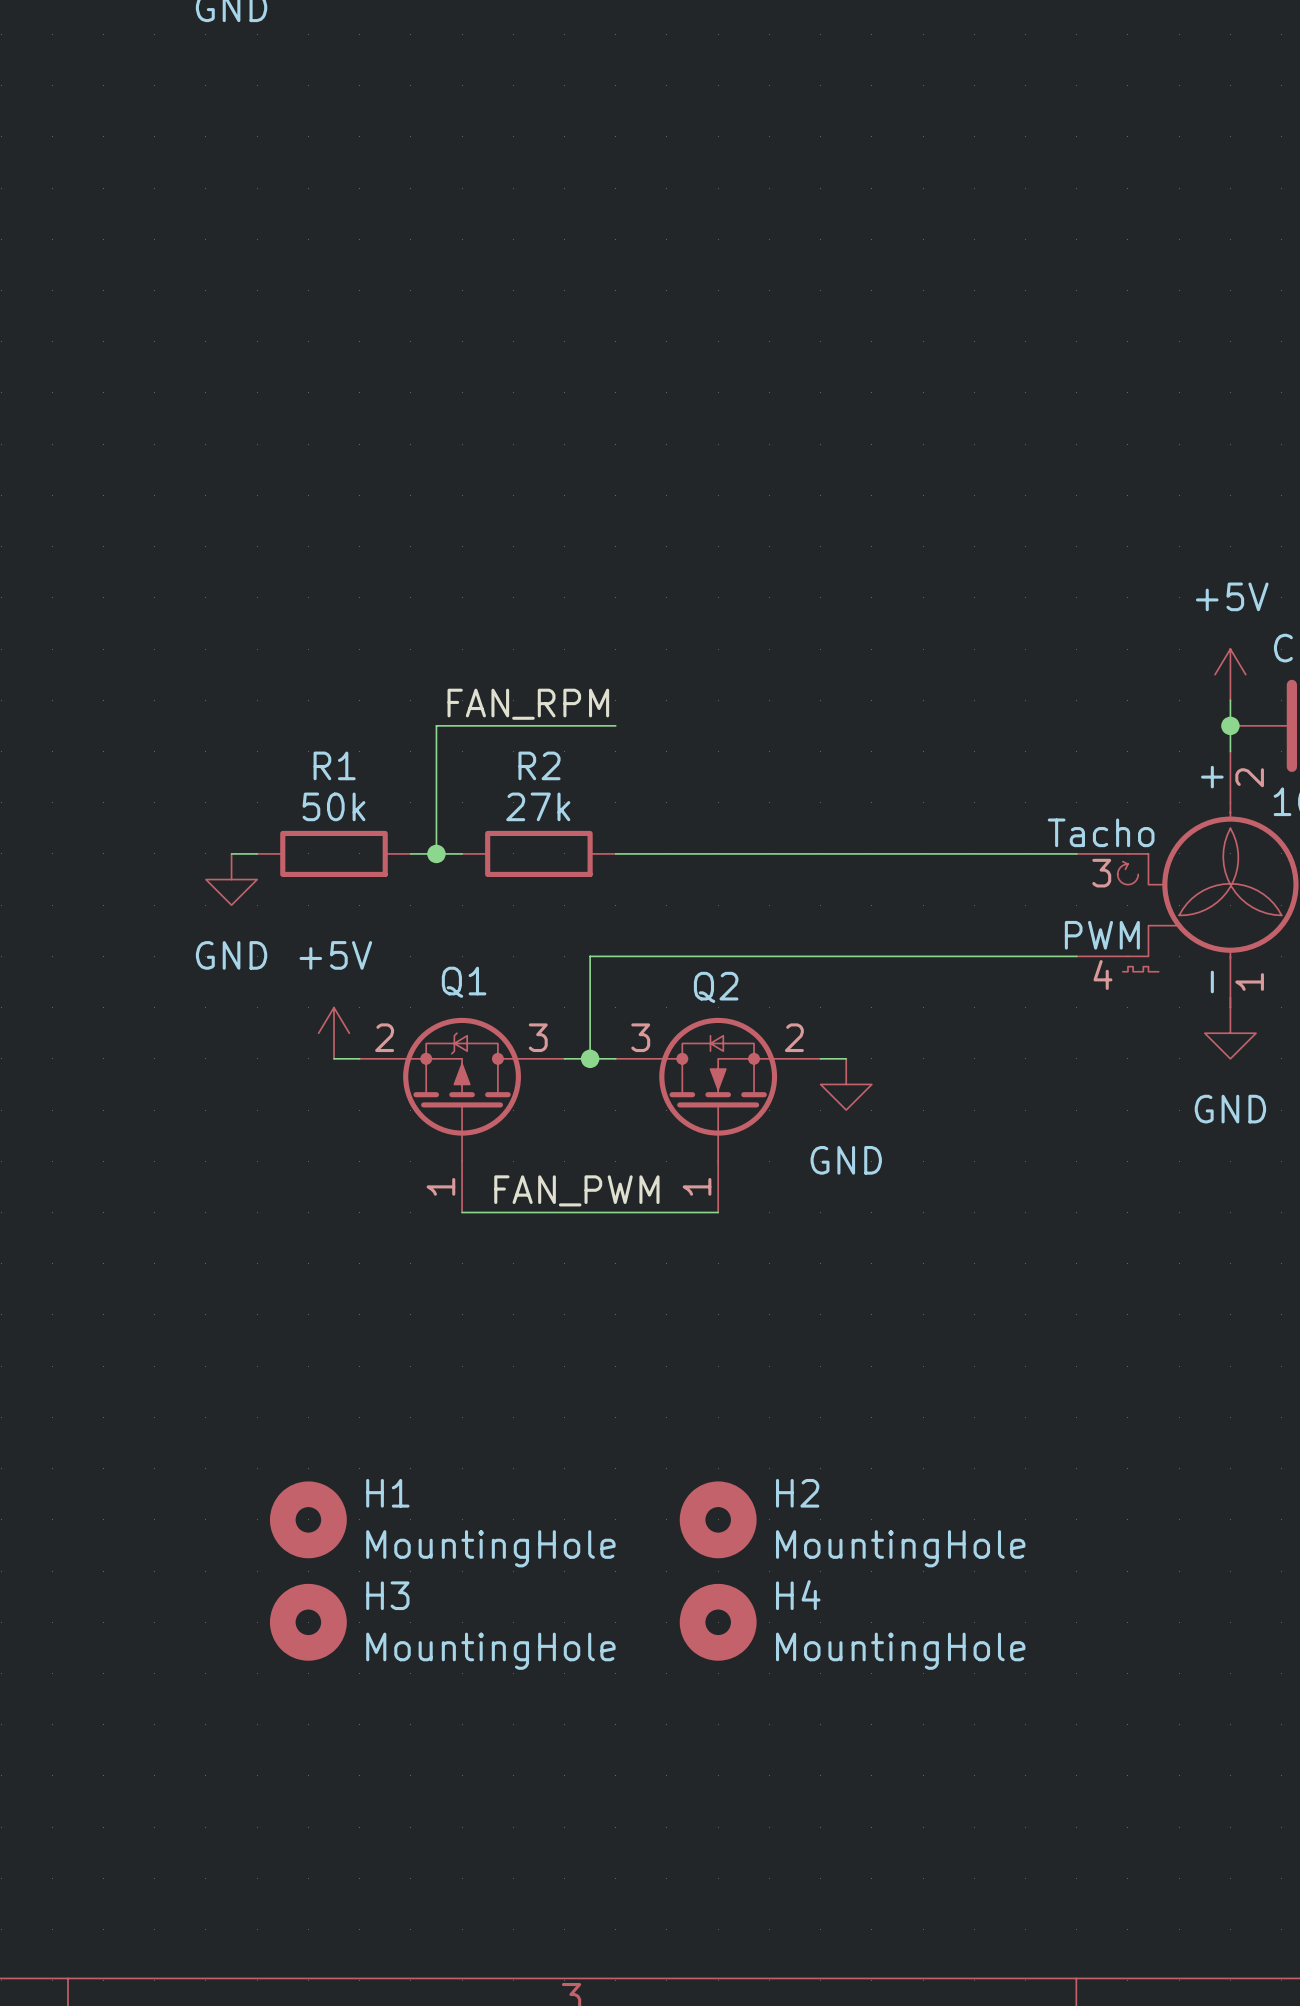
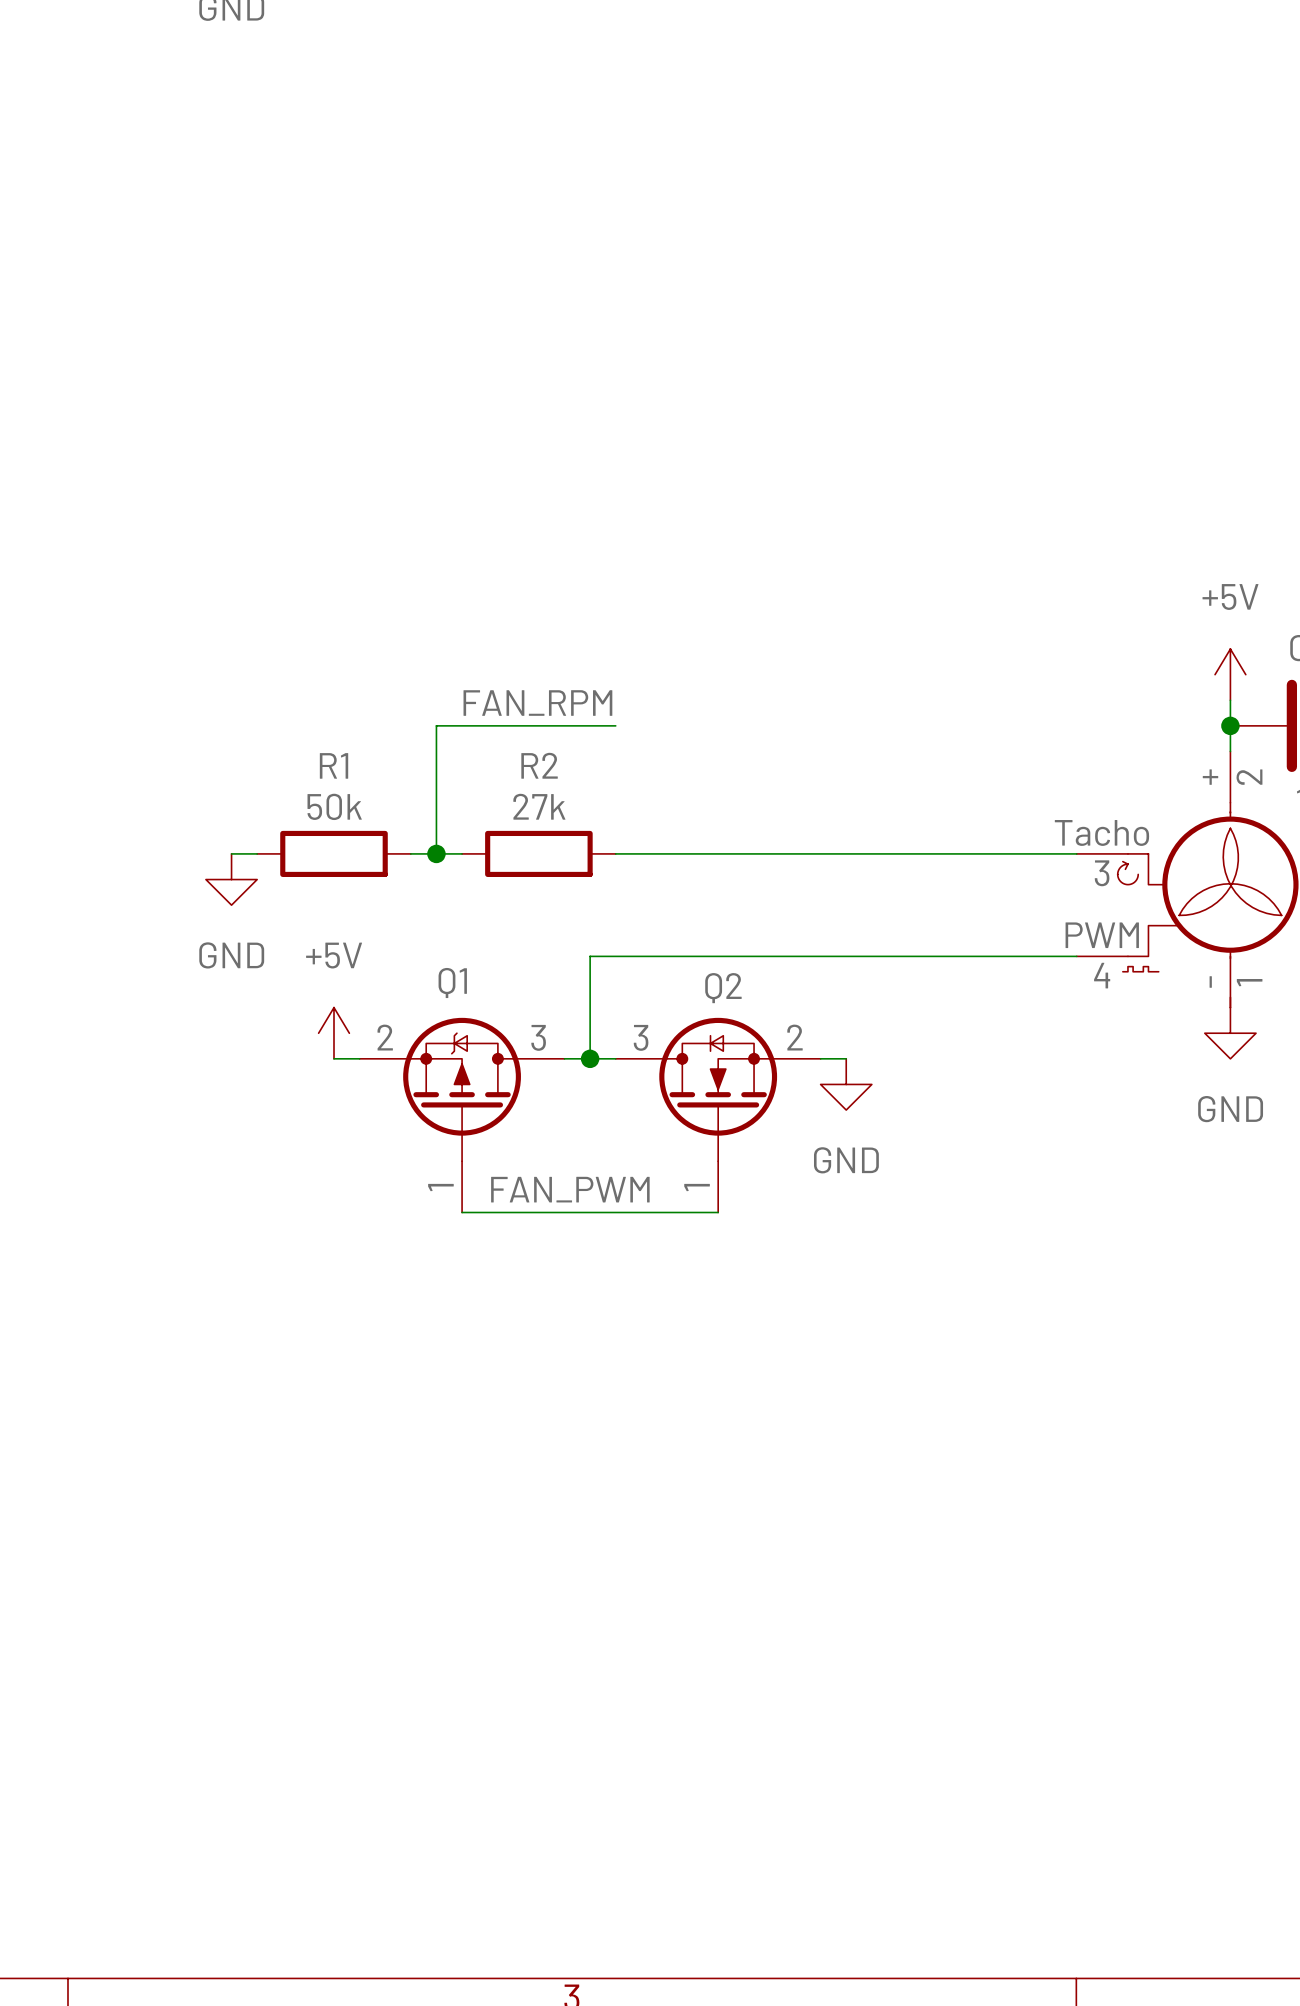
H1: MountingHole (308, 1519) -> none
H2: MountingHole (718, 1519) -> none
H3: MountingHole (308, 1622) -> none
H4: MountingHole (718, 1622) -> none

